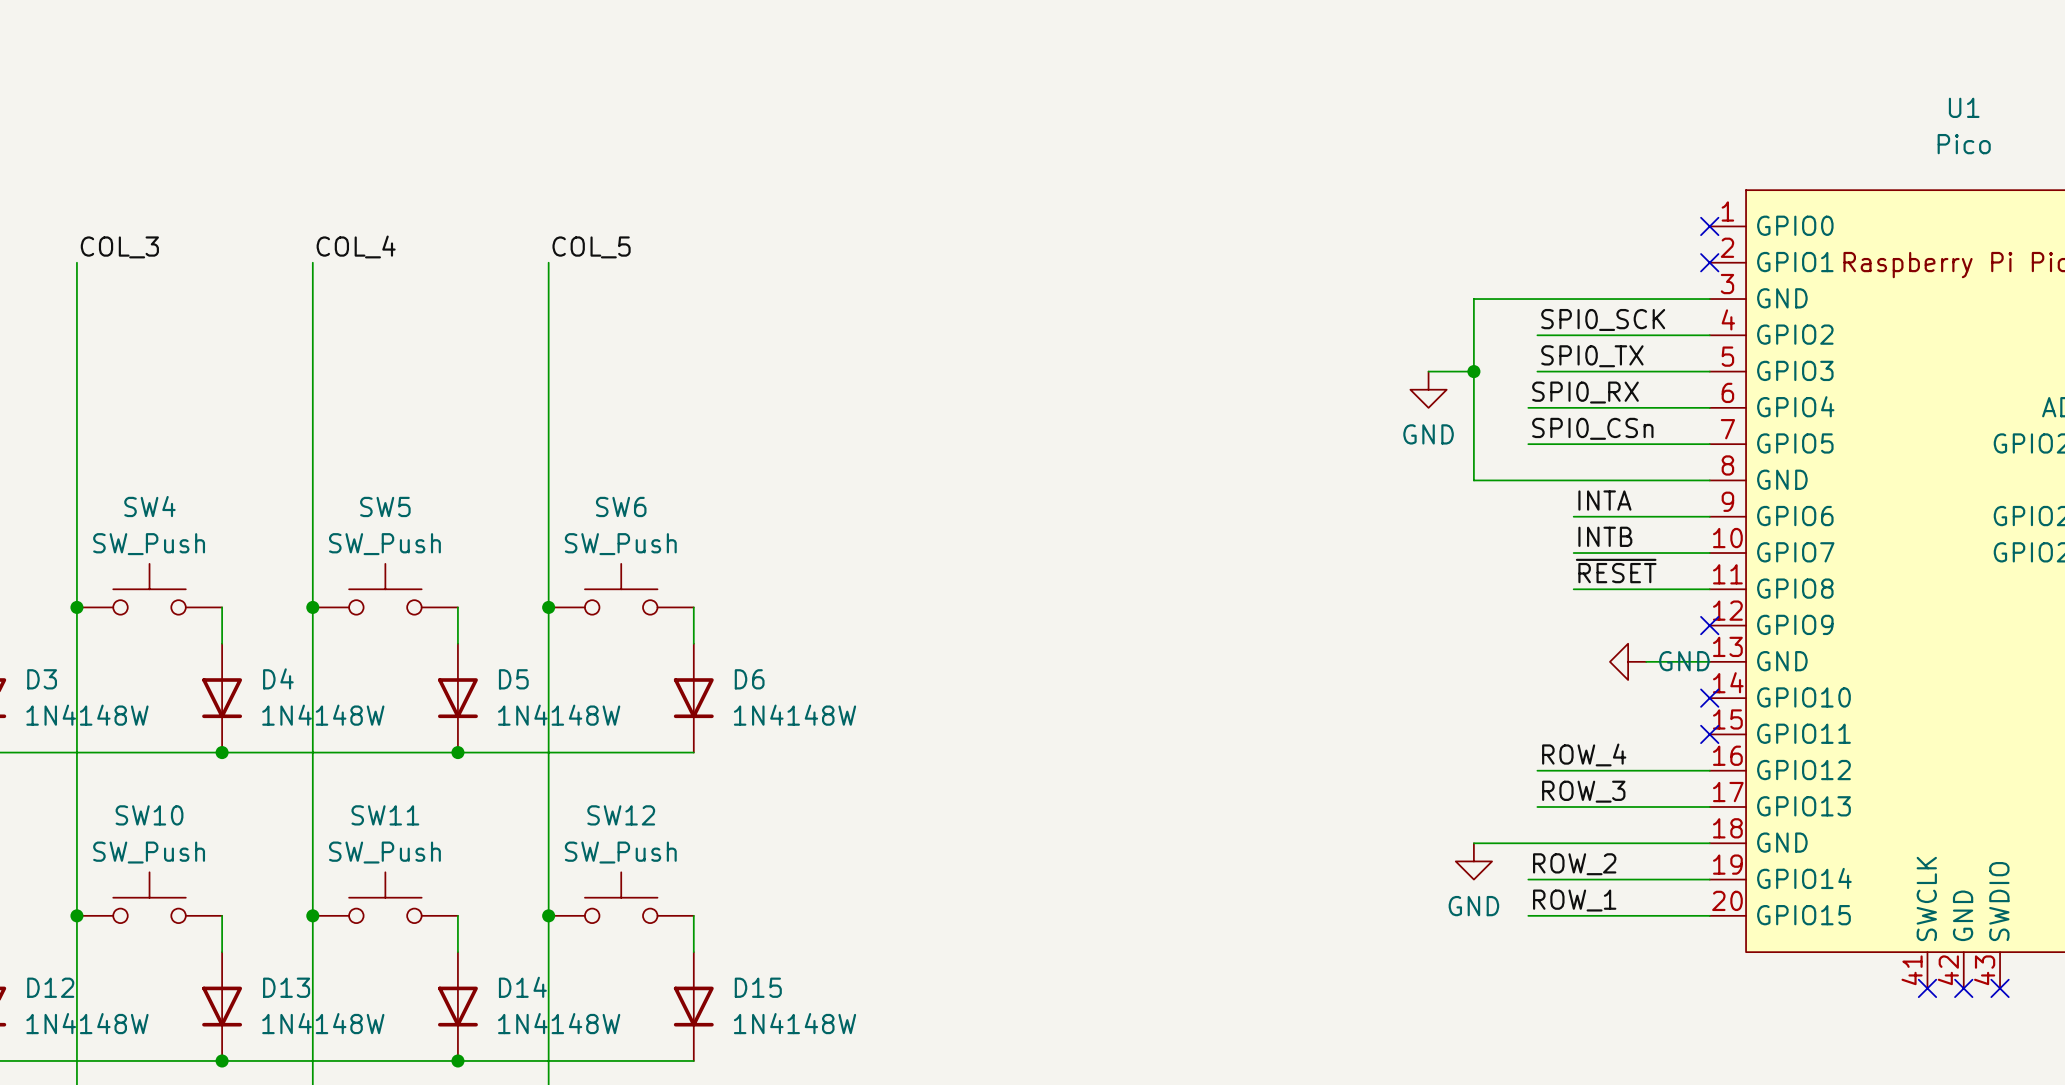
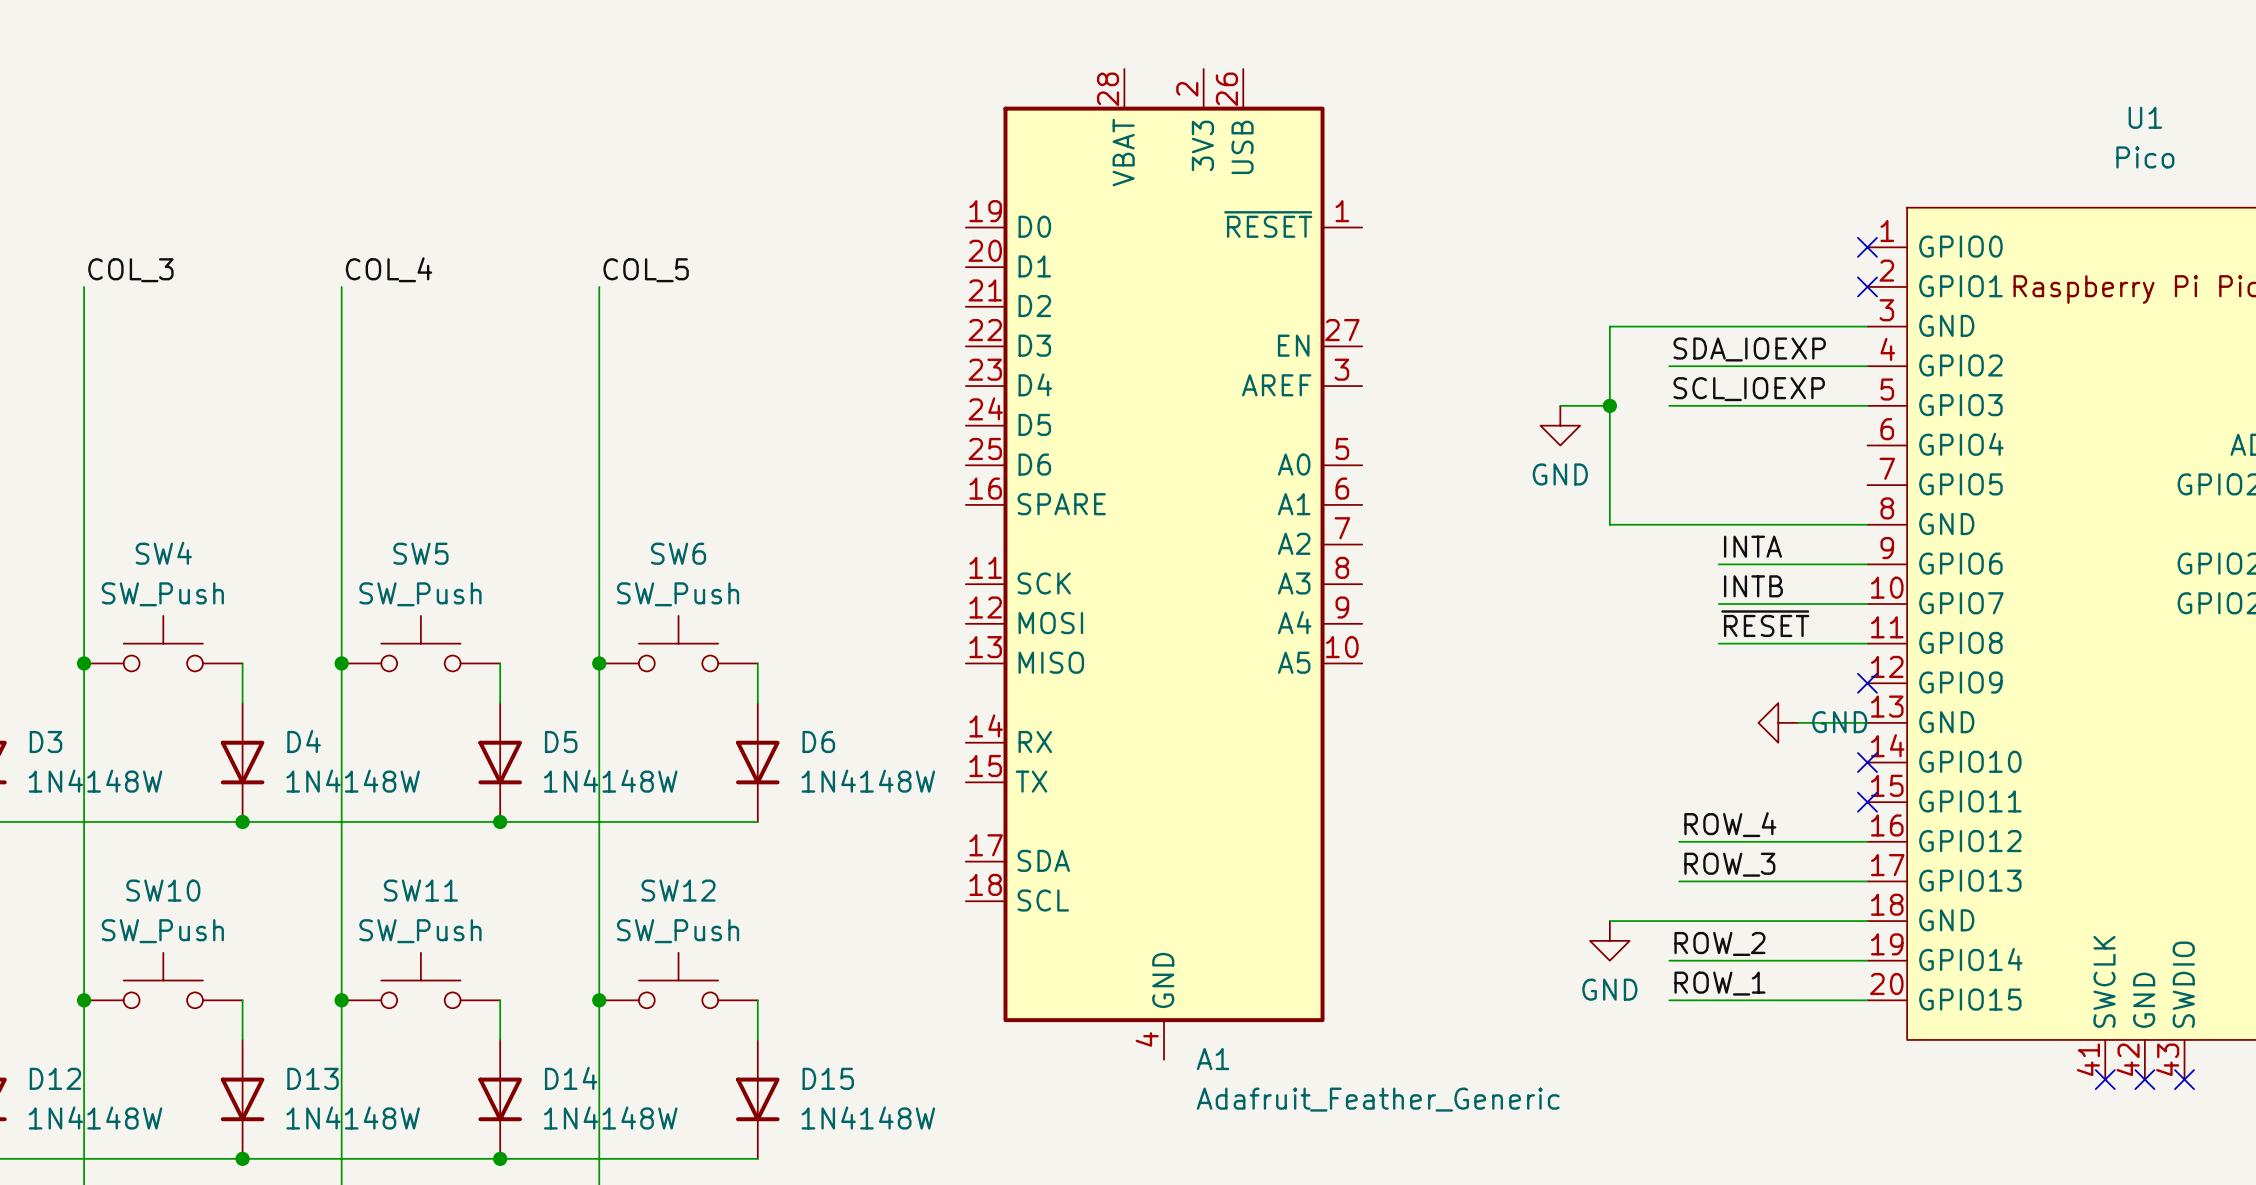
label: SPI0_SCK (1603, 319) -> SDA_IOEXP (1749, 349)
wire: none -> (1669, 366) (1679, 366)
label: SPI0_TX (1592, 356) -> SCL_IOEXP (1749, 389)
wire: none -> (1669, 405) (1679, 405)
label: SPI0_RX (1585, 392) -> none
wire: (1528, 407) (1709, 407) -> none
label: SPI0_CSn (1592, 428) -> none
wire: (1528, 444) (1709, 444) -> none
A1: none -> Adafruit_Feather_Generic (1164, 564)

